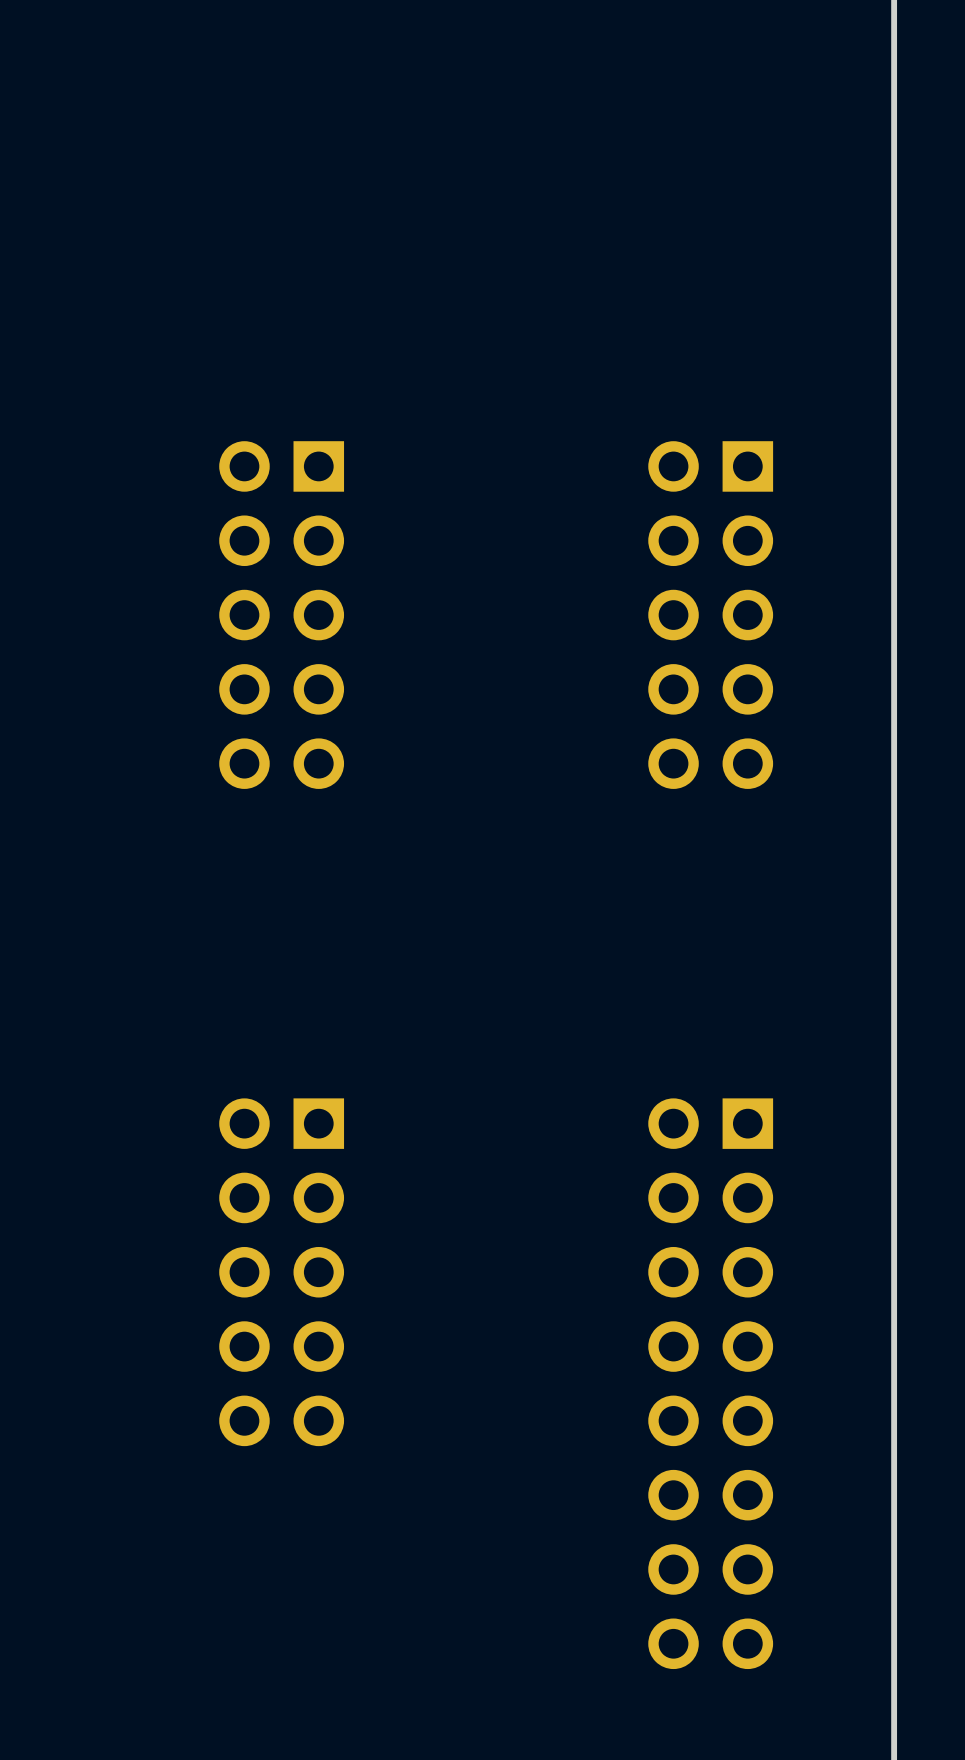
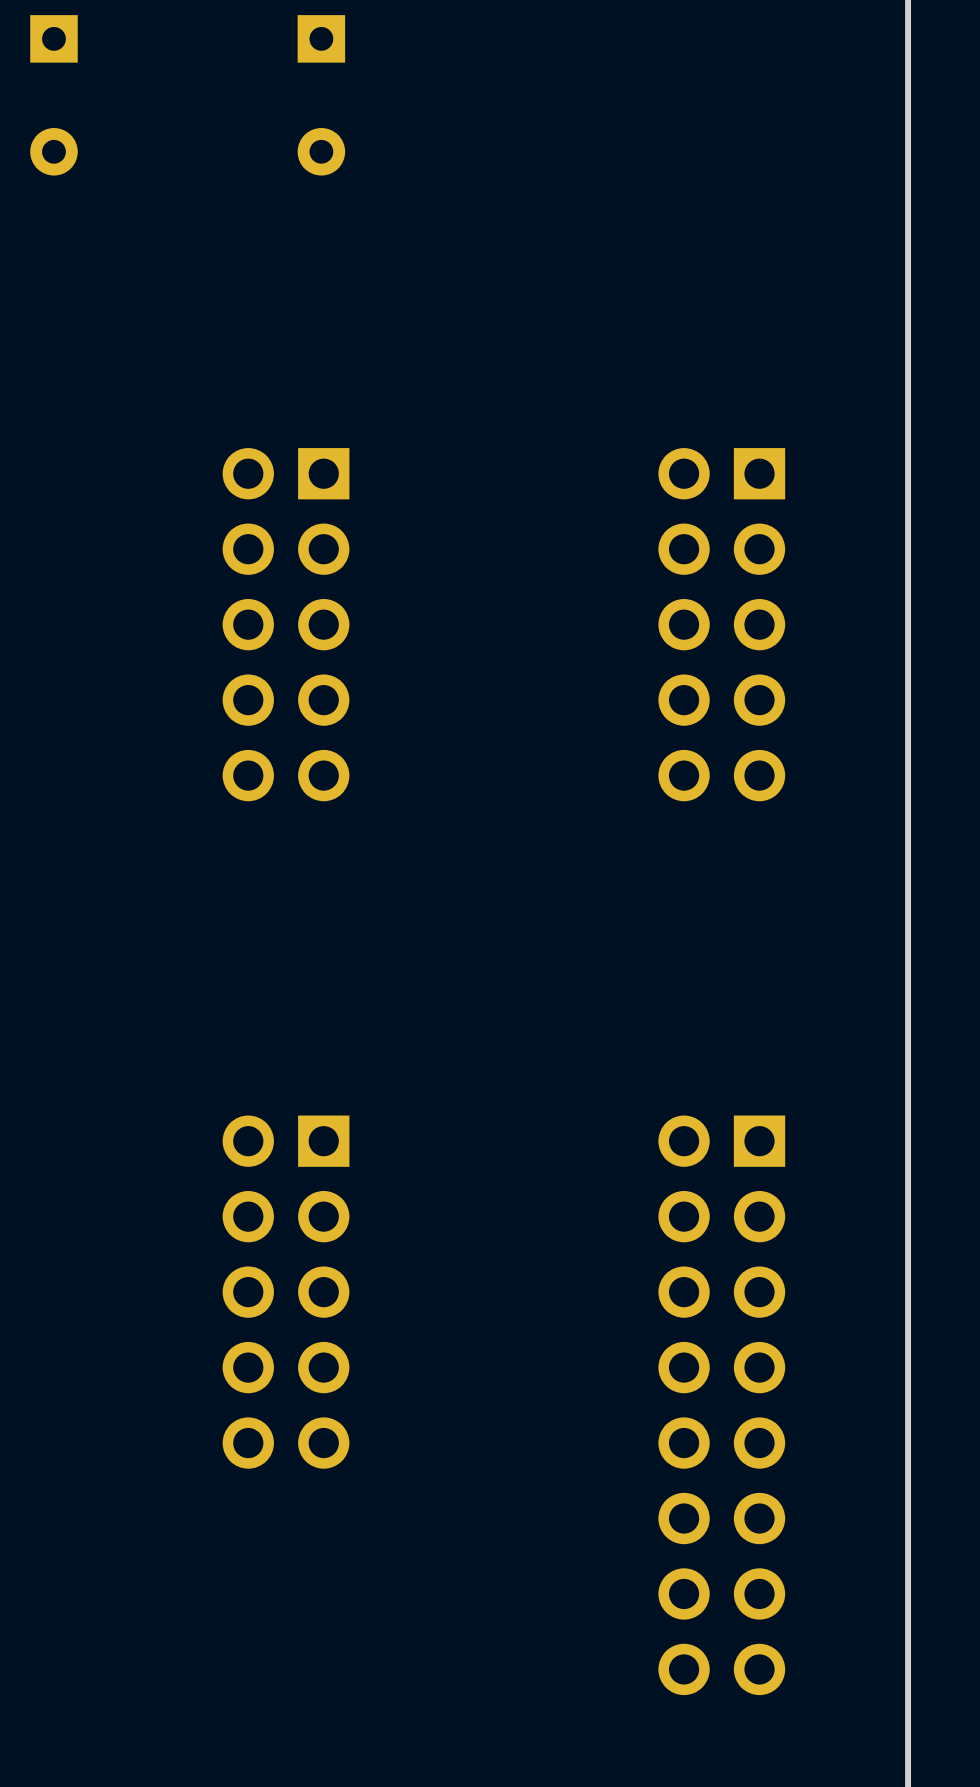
part: none -> (53, 95)
part: none -> (321, 95)

